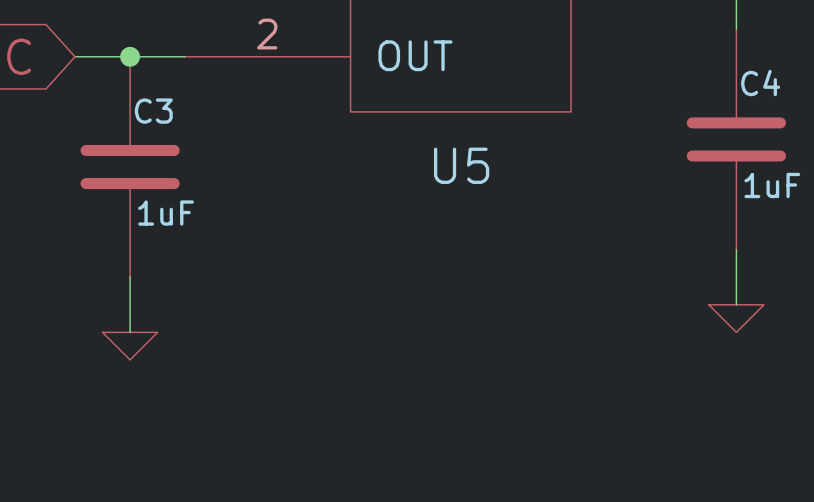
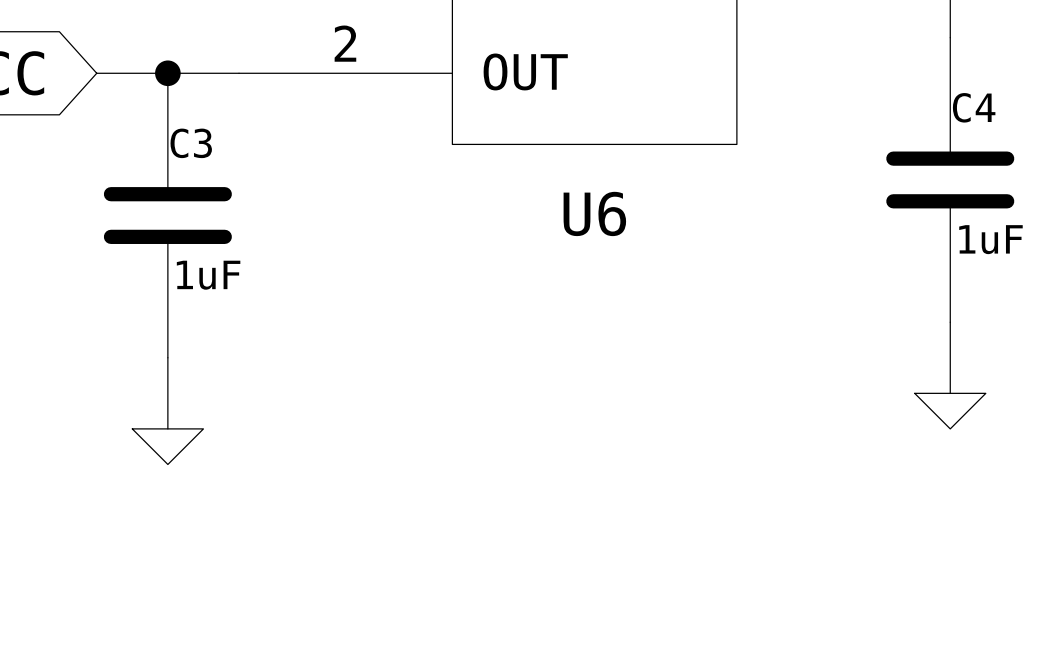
U5 name: U5 (461, 165) -> U6 (594, 213)

